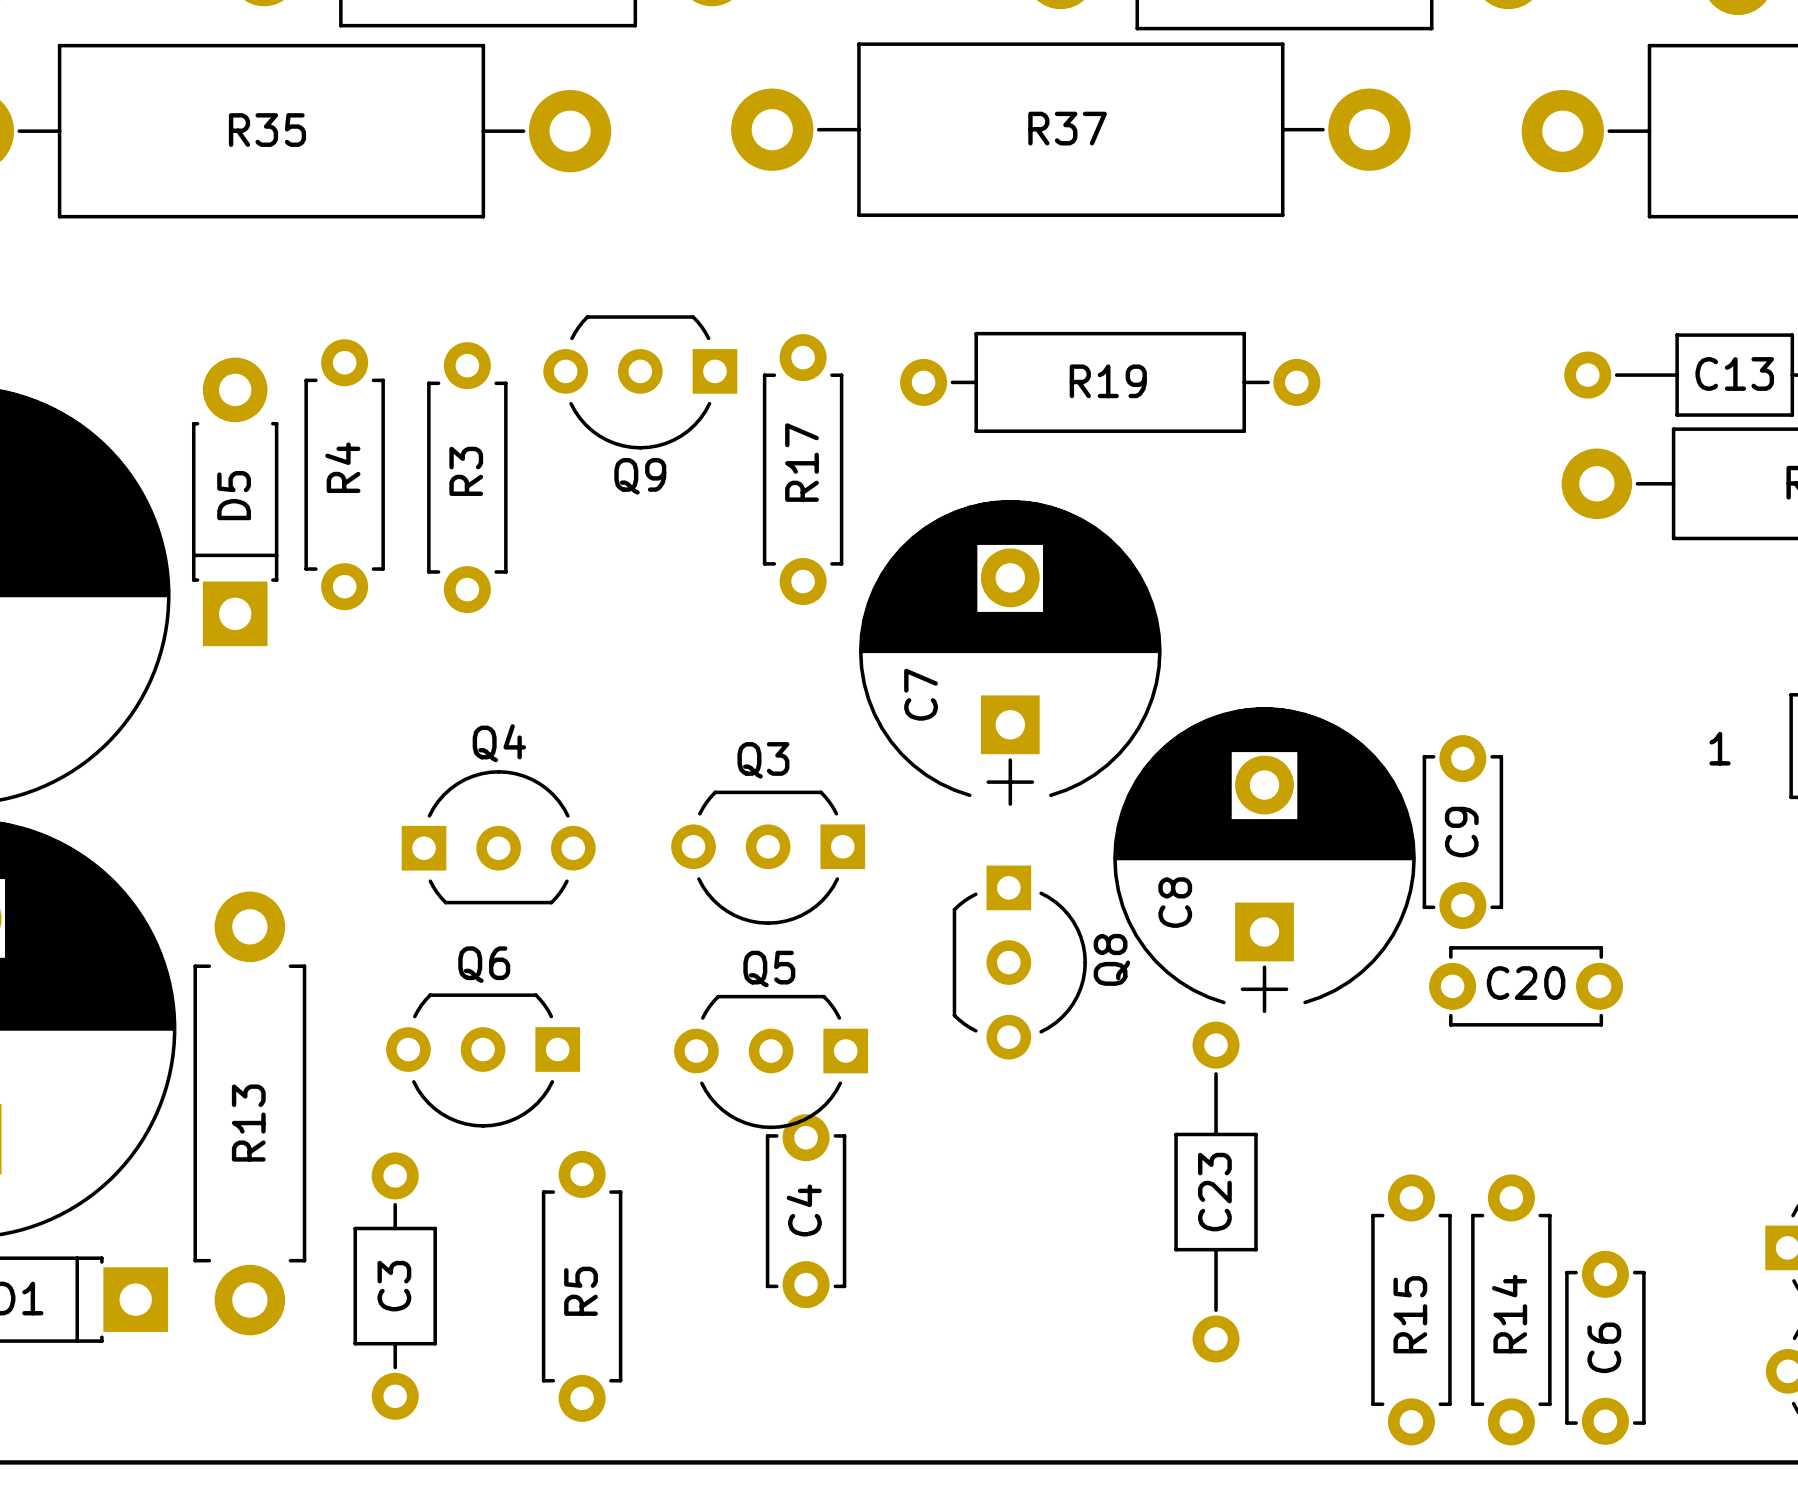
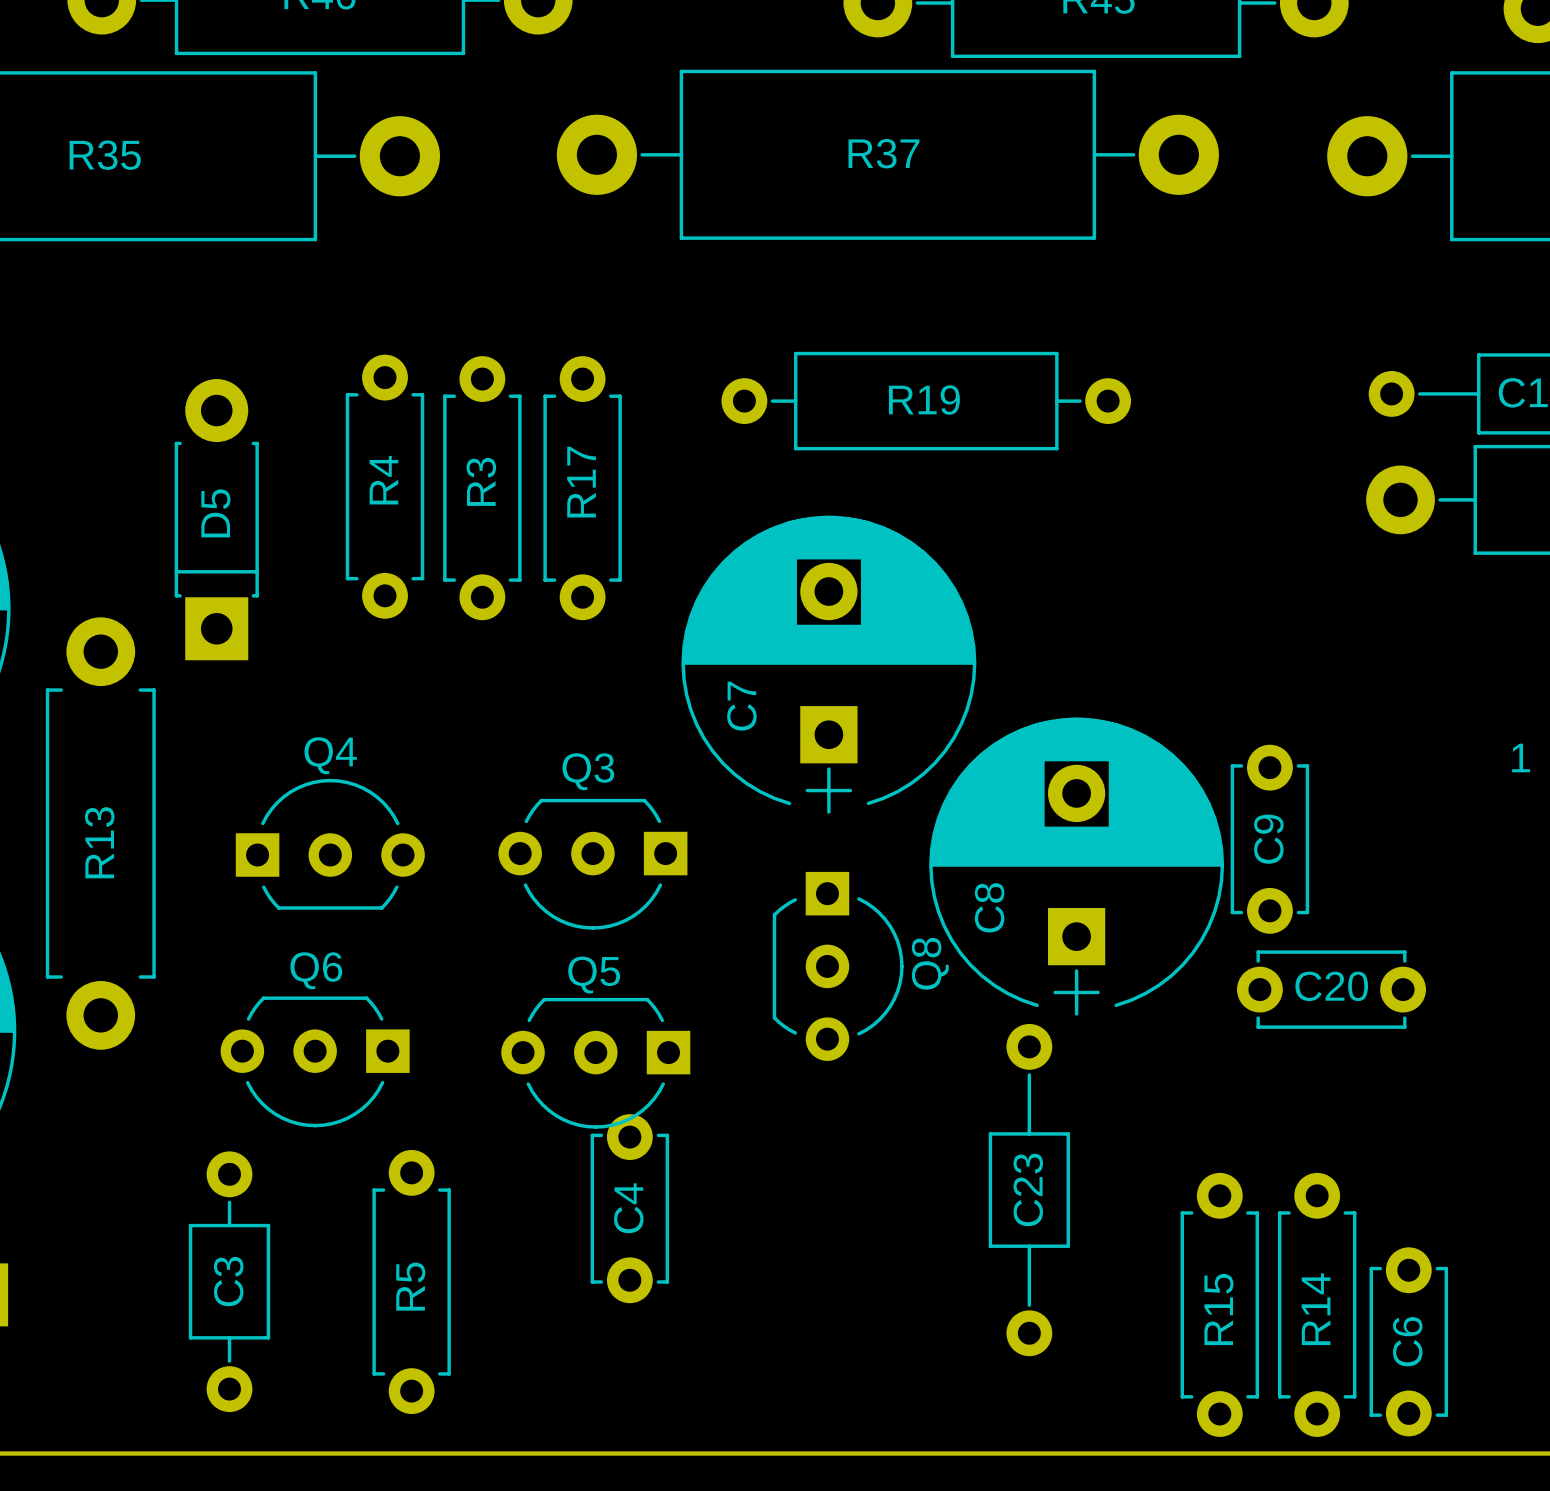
Q9: (640, 382) -> none
R17 position: (803, 469) -> (582, 488)
R4 position: (344, 474) -> (385, 486)
R3 position: (467, 477) -> (482, 488)
D5 position: (235, 501) -> (216, 519)
R13 position: (249, 1113) -> (100, 833)

